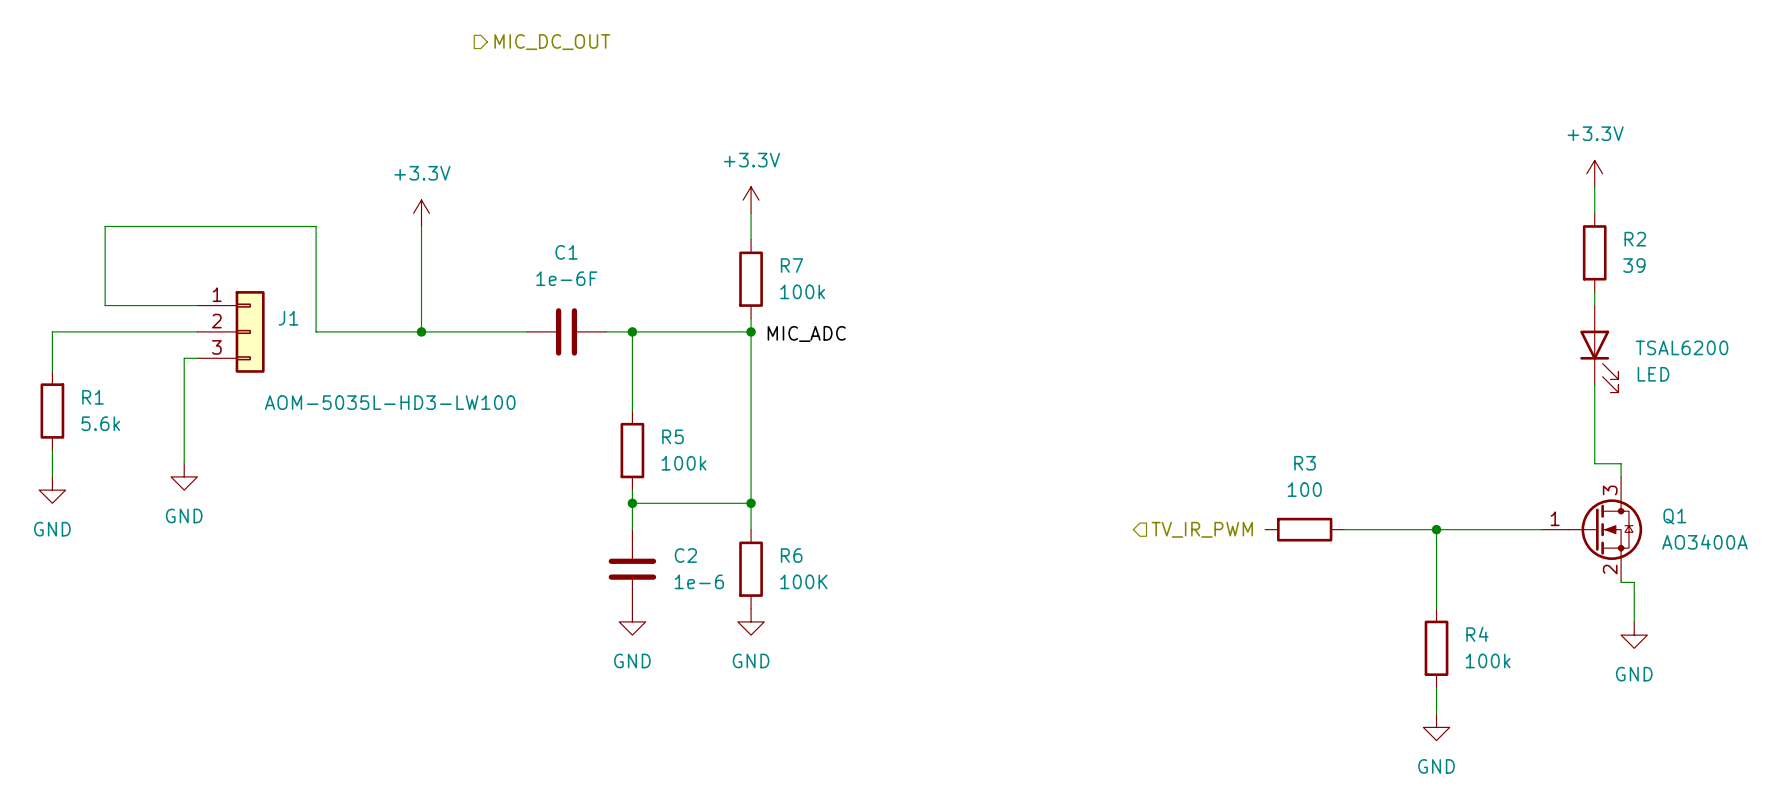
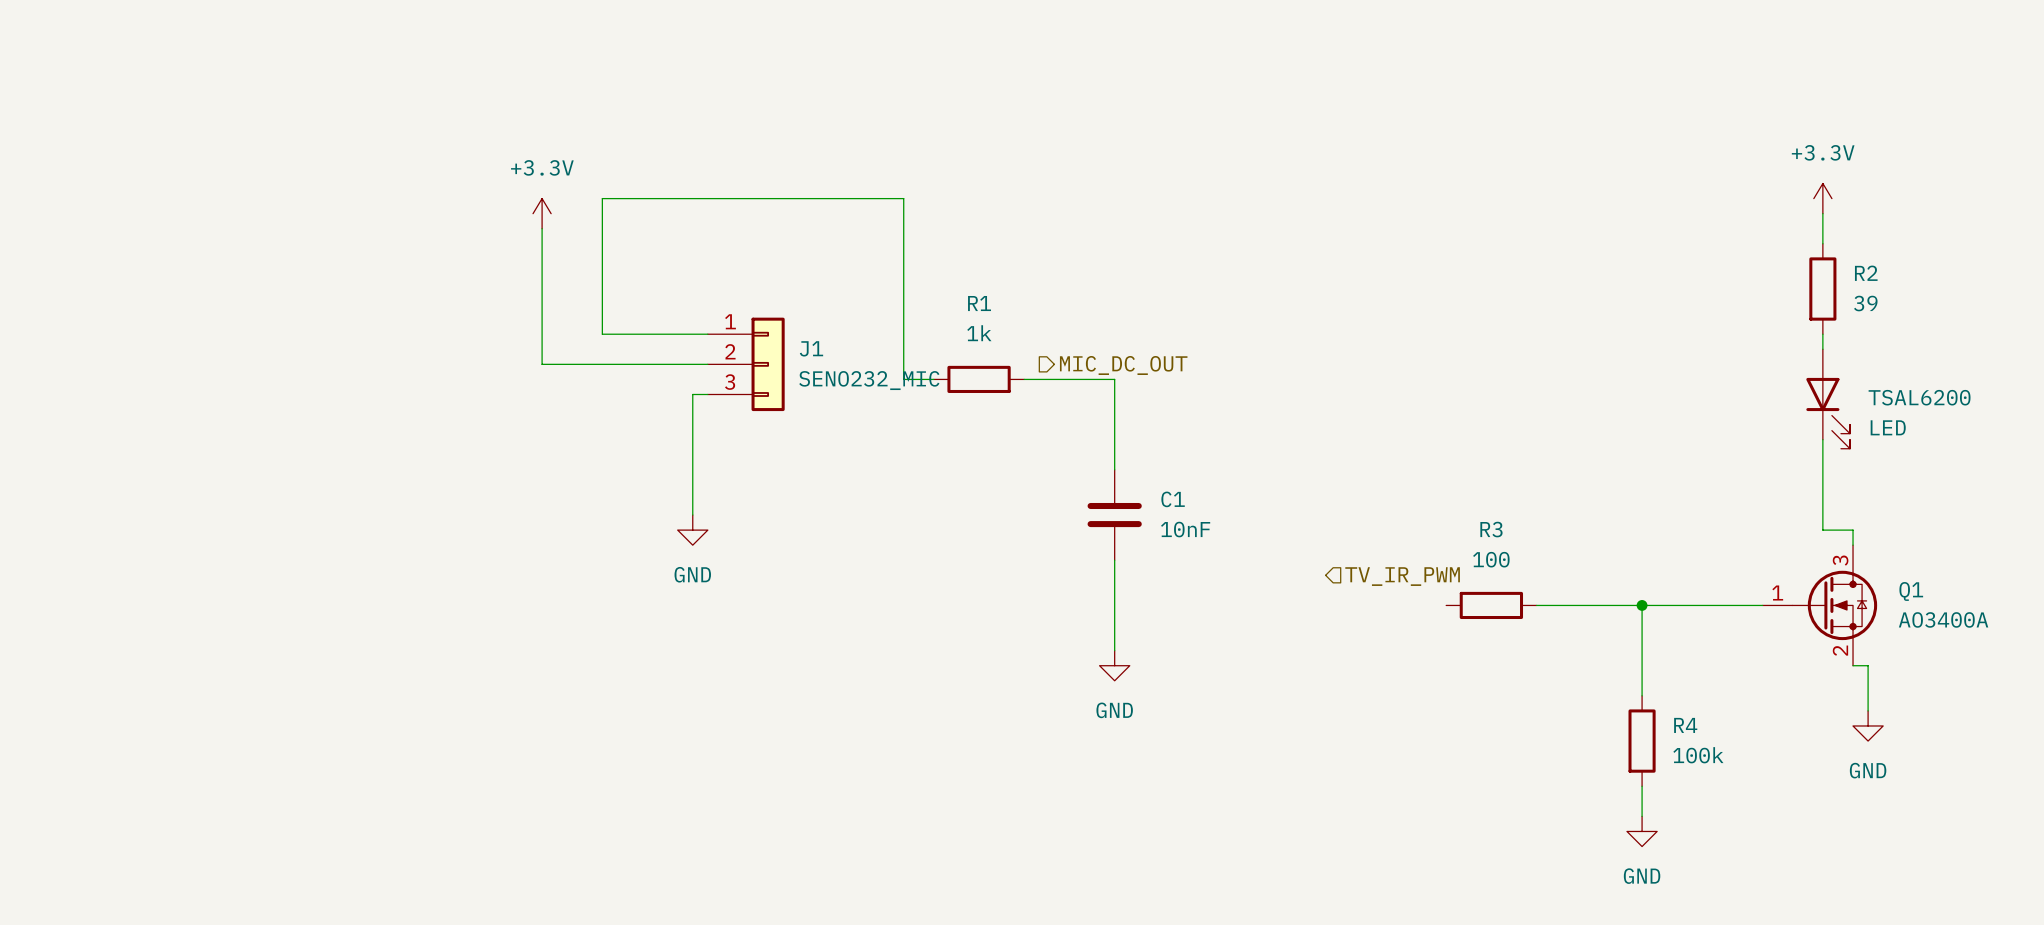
hierarchical label: MIC_DC_OUT (552, 42) -> none
wire: none -> (542, 228) (542, 364) (707, 364)
power symbol: +3.3V (751, 200) -> none
power symbol position: +3.3V (421, 213) -> +3.3V (542, 213)
wire: (751, 213) (751, 239) -> none
wire: (421, 226) (421, 331) -> none
C1 name position: C1 (566, 252) -> C1 (1173, 499)
C1 value: 1e-6F (566, 278) -> 10nF (1185, 529)
R7: 100k (751, 279) -> none
wire: none -> (707, 334) (602, 334) (602, 198) (903, 198) (903, 379) (933, 379)
wire: (197, 305) (105, 305) (105, 226) (316, 226) (316, 331) (526, 331) -> none
wire: (751, 318) (751, 529) -> none
hierarchical label: none -> MIC_DC_OUT (1123, 365)
wire: (197, 331) (52, 331) (52, 371) -> none
J1 position: (231, 331) -> (746, 364)
junction: (421, 331) -> none
C1 rotation: 0° (566, 331) -> 90° clockwise (1114, 515)
C1 position: (566, 331) -> (1114, 515)
wire: (606, 331) (751, 331) -> none
wire: (632, 331) (632, 411) -> none
junction: (632, 331) -> none
junction: (751, 331) -> none
wire: none -> (1024, 379) (1114, 379) (1114, 469)
label: MIC_ADC (806, 333) -> none
wire: none -> (707, 394) (692, 394) (692, 515)
wire: (197, 358) (184, 358) (184, 463) -> none
R1 name position: R1 (92, 397) -> R1 (979, 303)
J1 value: AOM-5035L-HD3-LW100 (390, 402) -> SENO232_MIC (869, 380)
R1 rotation: 0° (52, 411) -> 90° clockwise (979, 379)
R1 position: (52, 411) -> (979, 379)
R1 value: 5.6k (100, 423) -> 1k (979, 333)
wire: (52, 450) (52, 476) -> none
R5: 100k (632, 450) -> none
power symbol: none -> GND (692, 530)
power symbol: GND (184, 476) -> none
power symbol: GND (52, 490) -> none
wire: (632, 490) (632, 529) -> none
wire: none -> (1114, 560) (1114, 650)
wire: (632, 503) (751, 503) -> none
junction: (632, 503) -> none
junction: (751, 503) -> none
hierarchical label position: TV_IR_PWM (1202, 529) -> TV_IR_PWM (1402, 576)
C2: 1e-6 (632, 569) -> none
R6: 100K (751, 569) -> none
power symbol: none -> GND (1114, 665)
power symbol: GND (632, 621) -> none
power symbol: GND (751, 621) -> none

